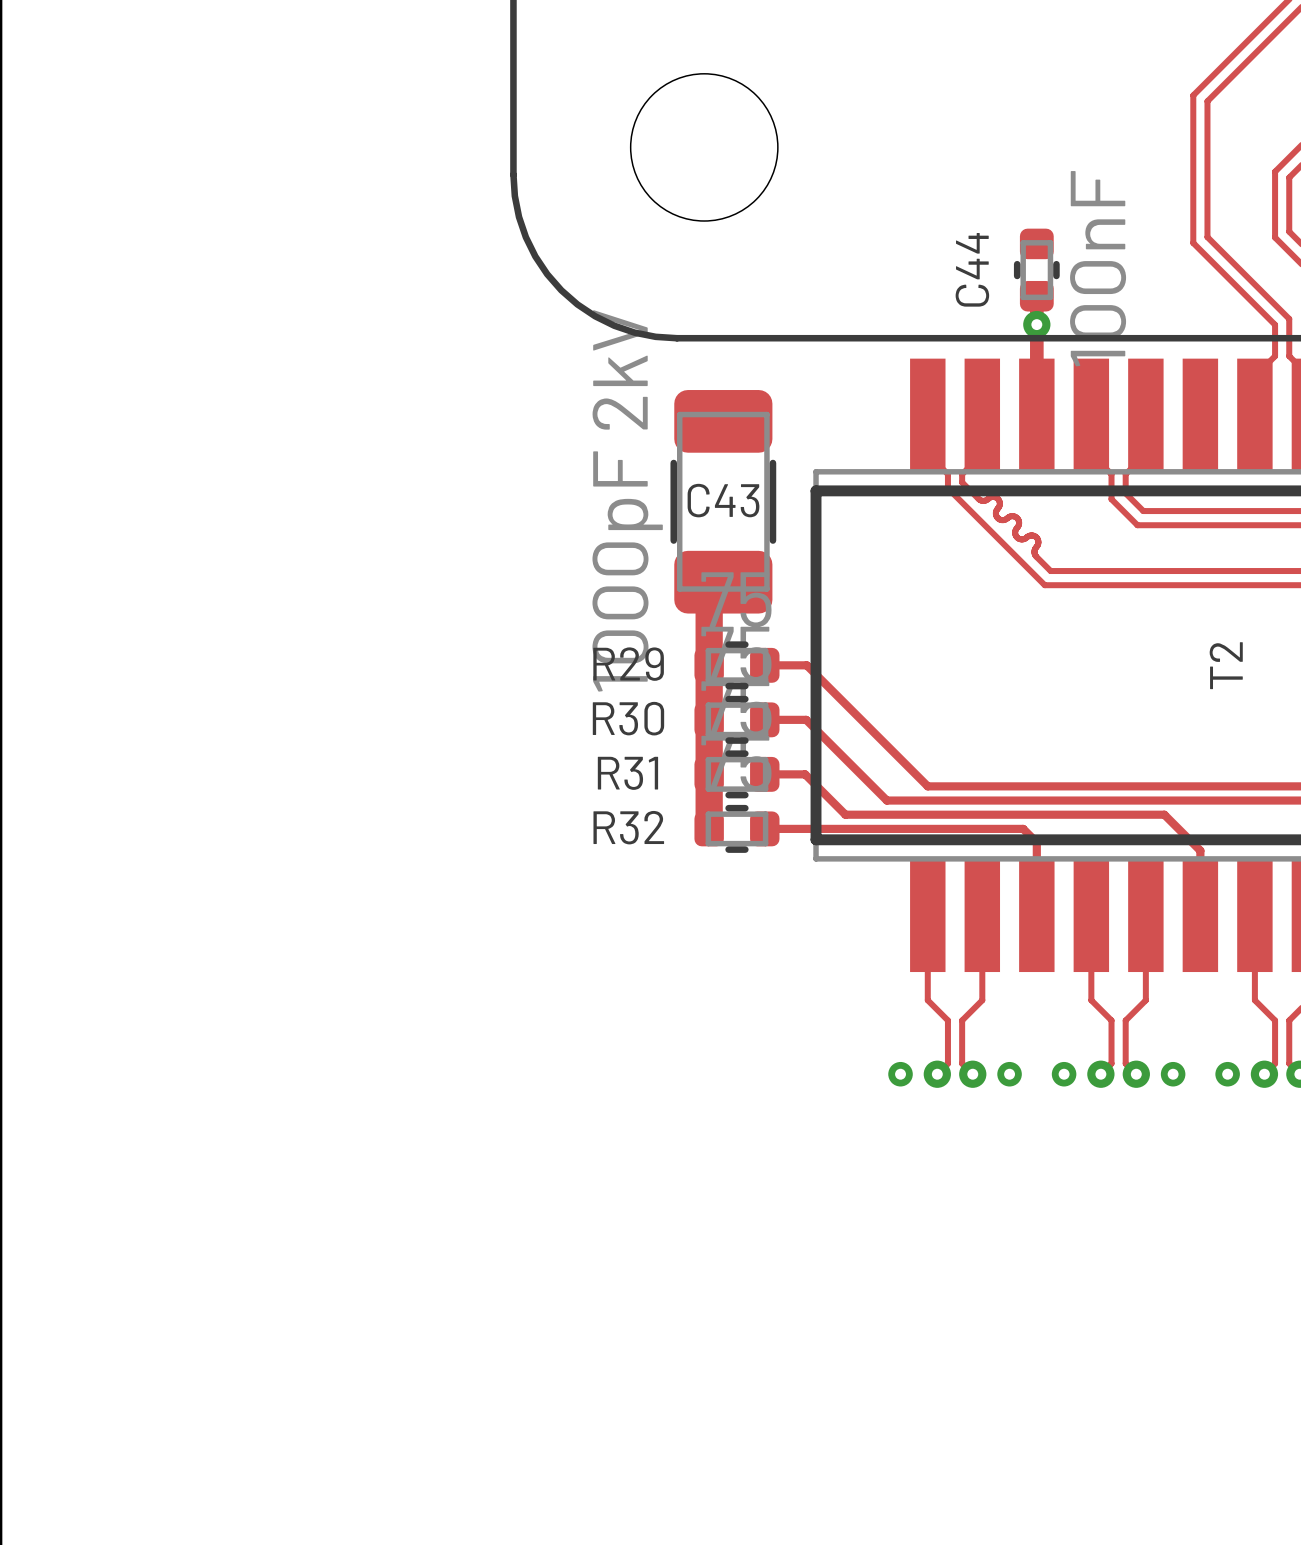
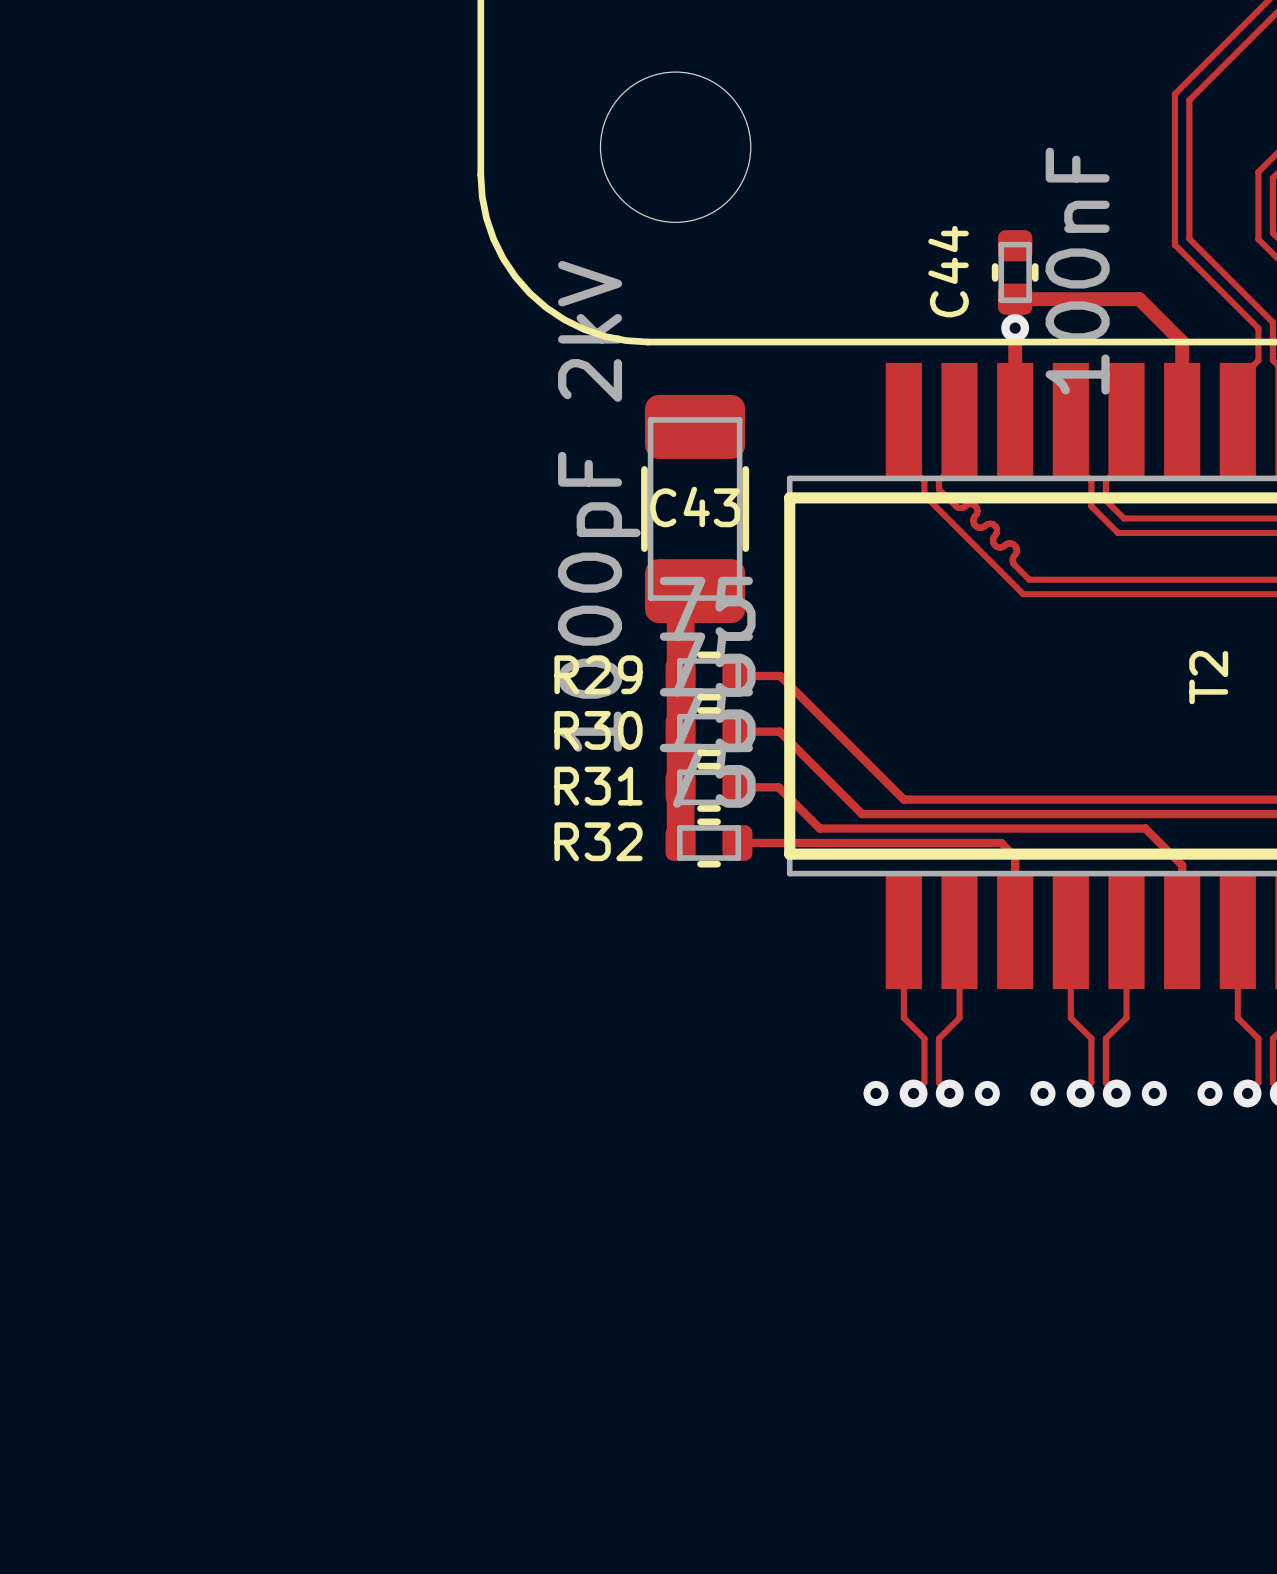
track: none -> (1015, 299) (1139, 299) (1182, 342) (1182, 420)

